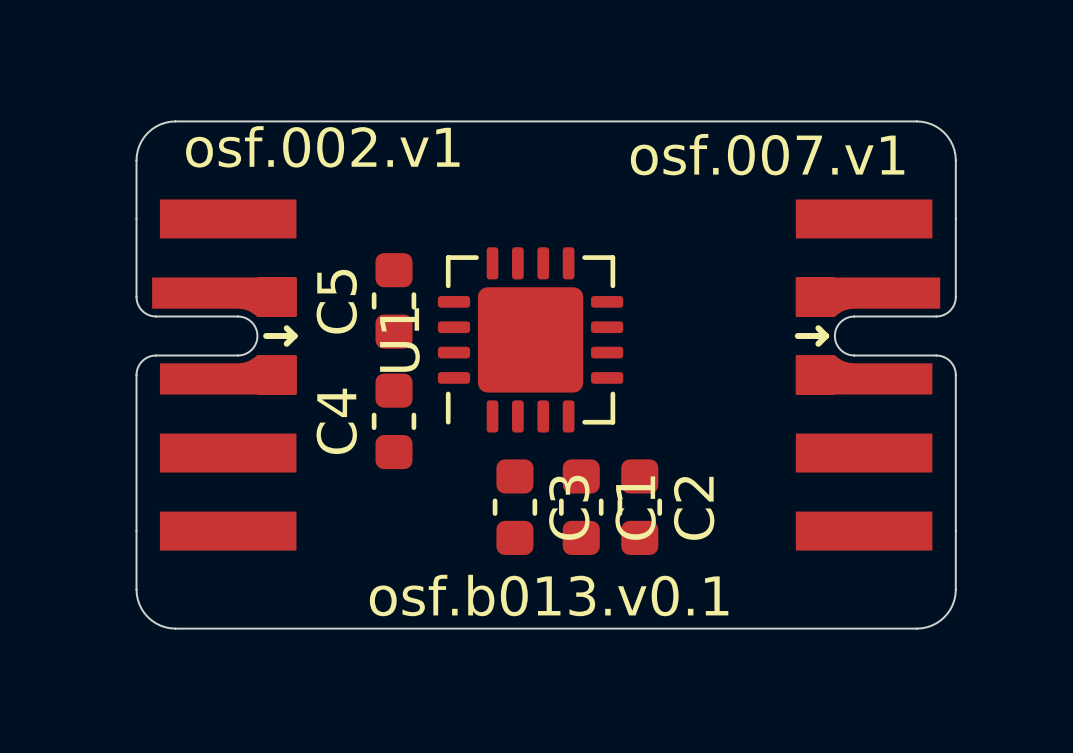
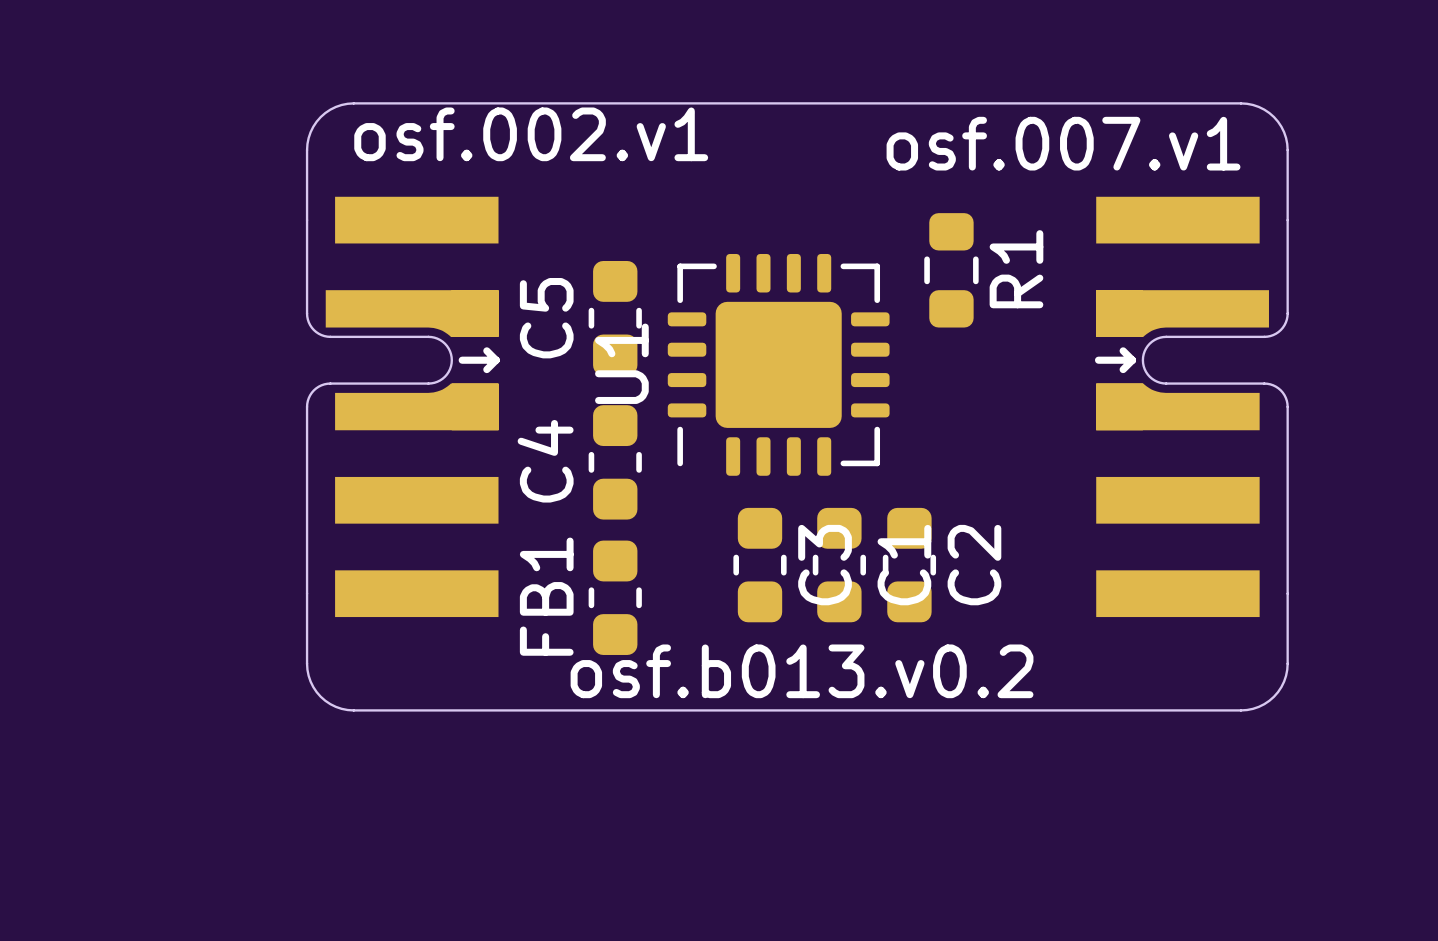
R1: none -> (951, 270)
FB1: none -> (615, 597)
text: osf.b013.v0.1 (549, 595) -> osf.b013.v0.2 (802, 671)

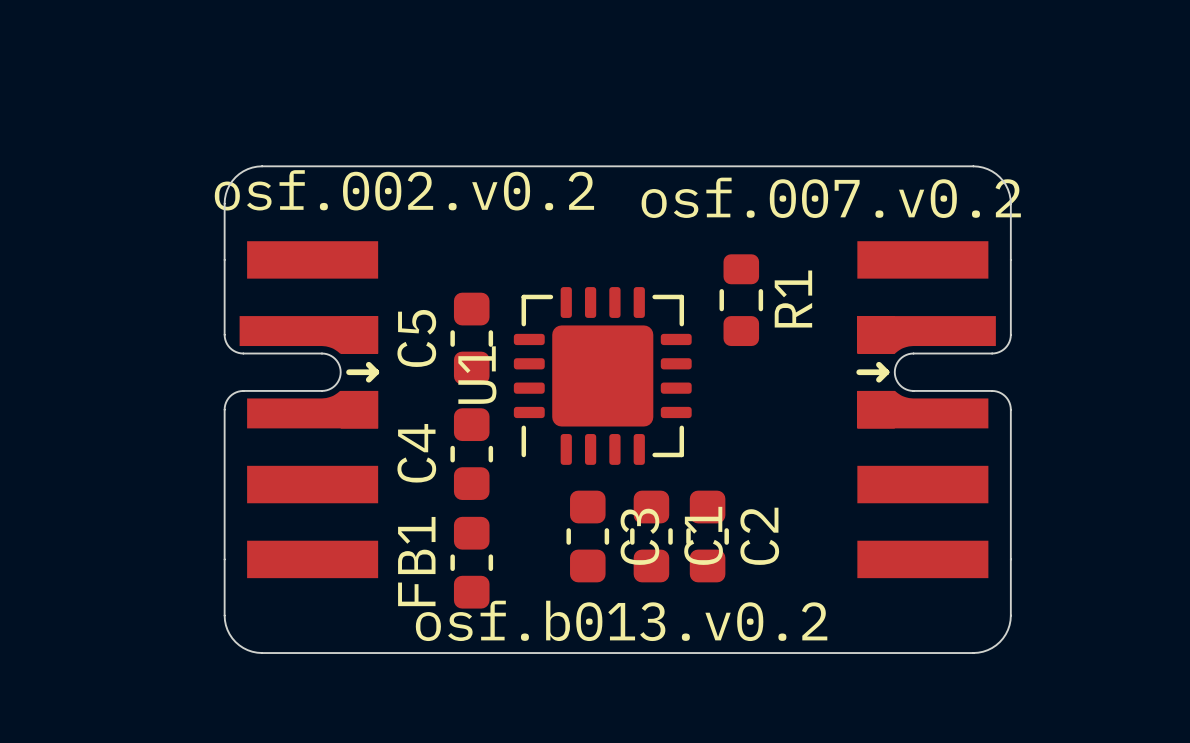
text: osf.002.v1 (531, 134) -> osf.002.v0.2 (404, 190)
text: osf.007.v1 (1063, 143) -> osf.007.v0.2 (831, 197)

